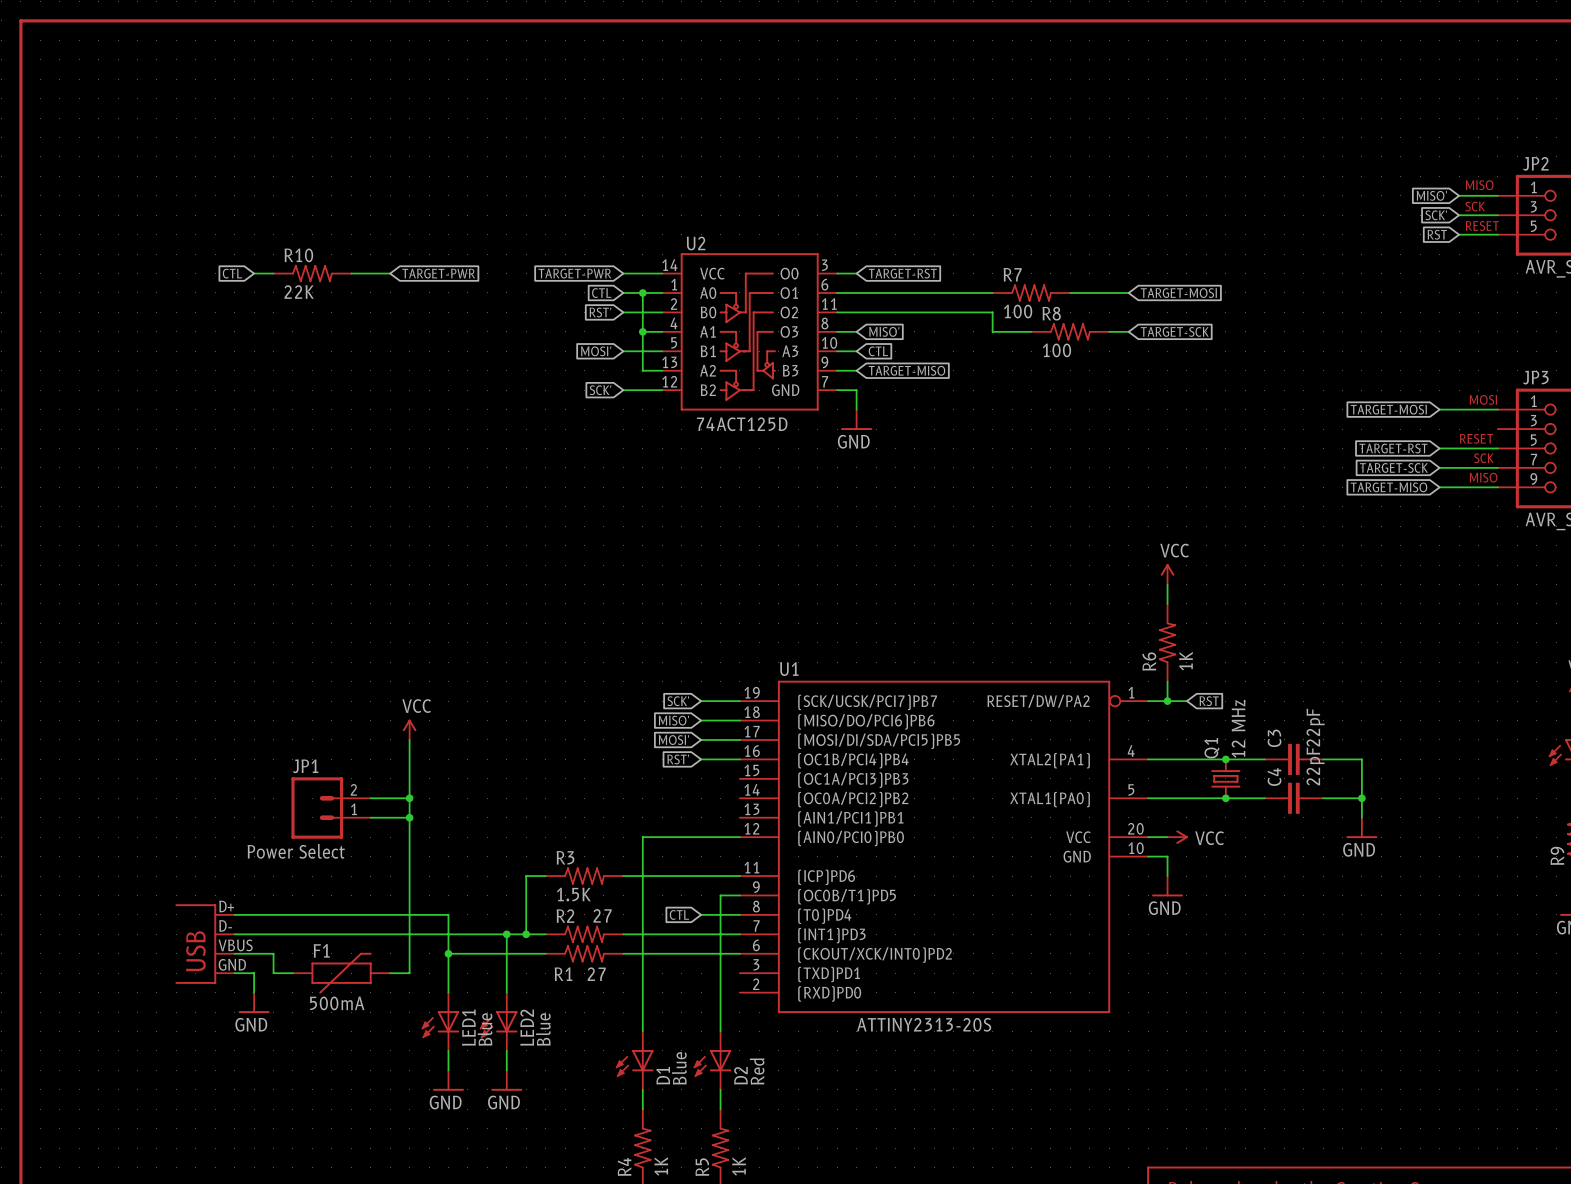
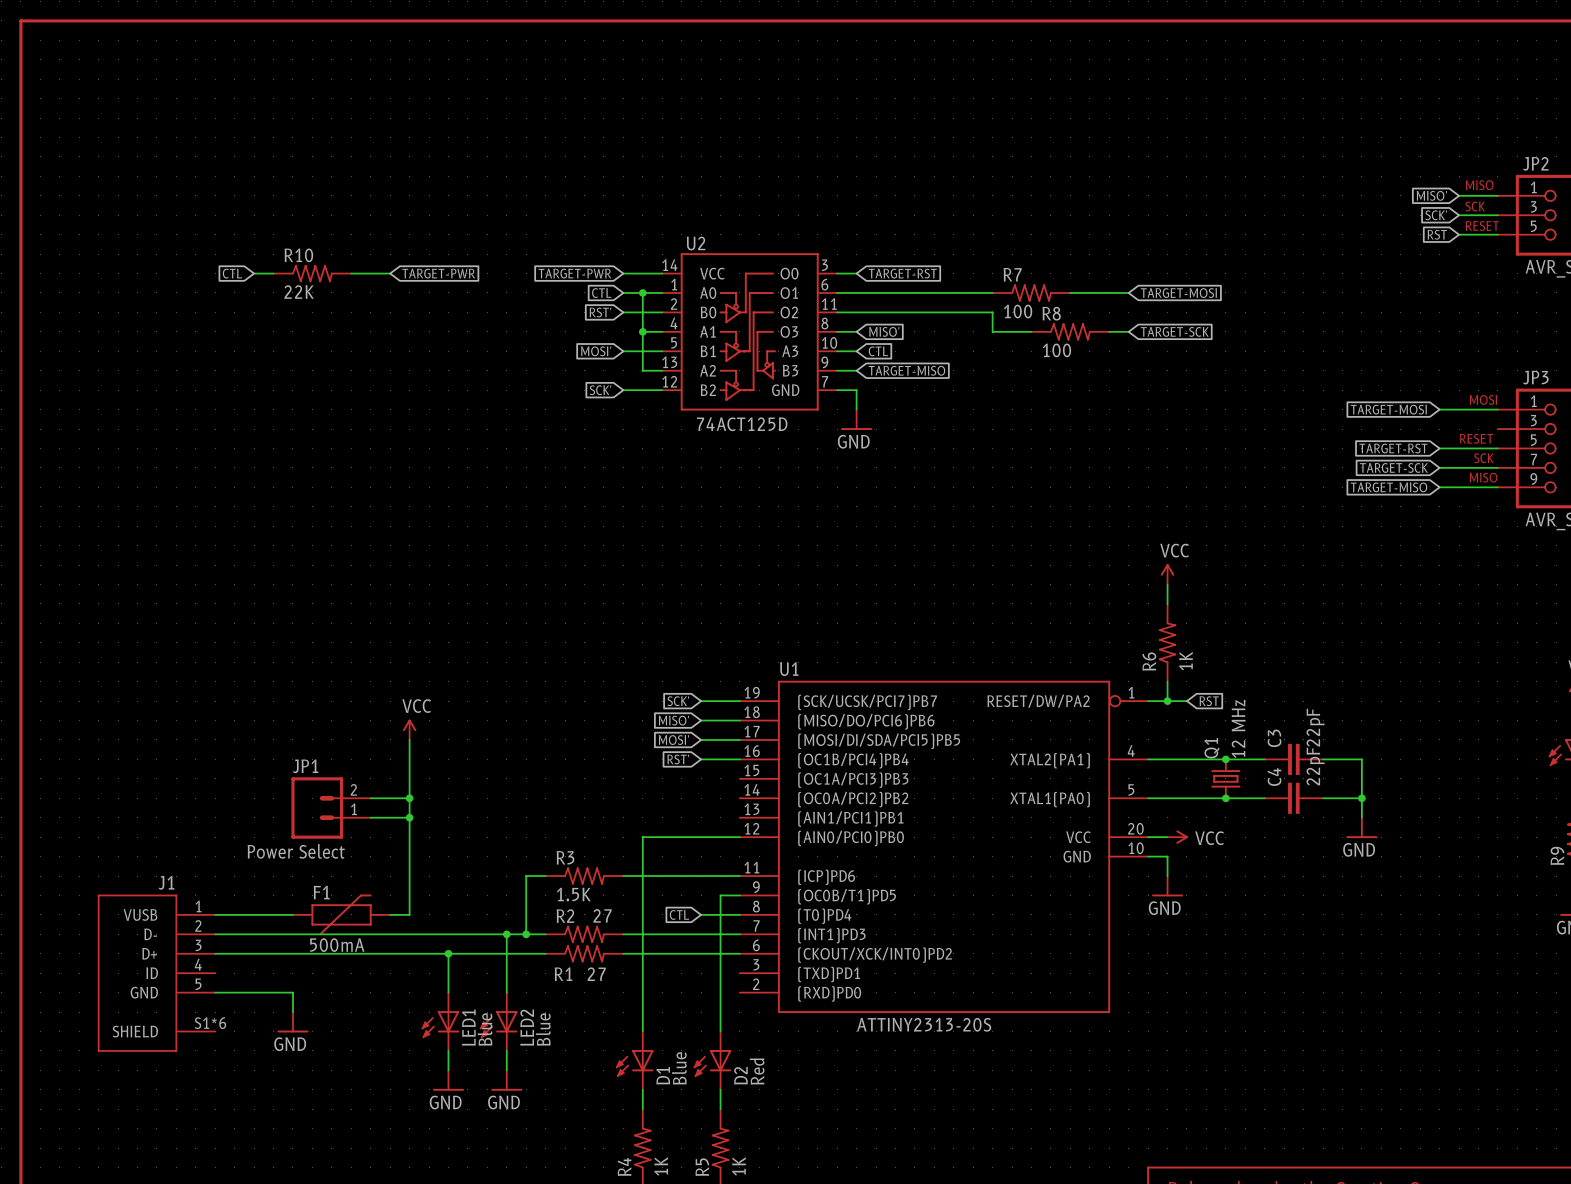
wire: (292, 914) (390, 914) -> none
part: (205, 944) -> none
wire: (273, 953) (273, 973) (292, 973) -> none
wire: (448, 953) (448, 914) (409, 914) (409, 973) (390, 973) -> (448, 953) (273, 953)
J1: none -> (156, 973)
wire: (234, 973) (254, 973) (254, 992) -> none
F1 position: (341, 973) -> (341, 914)
wire: none -> (215, 992) (292, 992) (292, 1012)
power symbol position: GND (254, 1002) -> GND (292, 1022)

